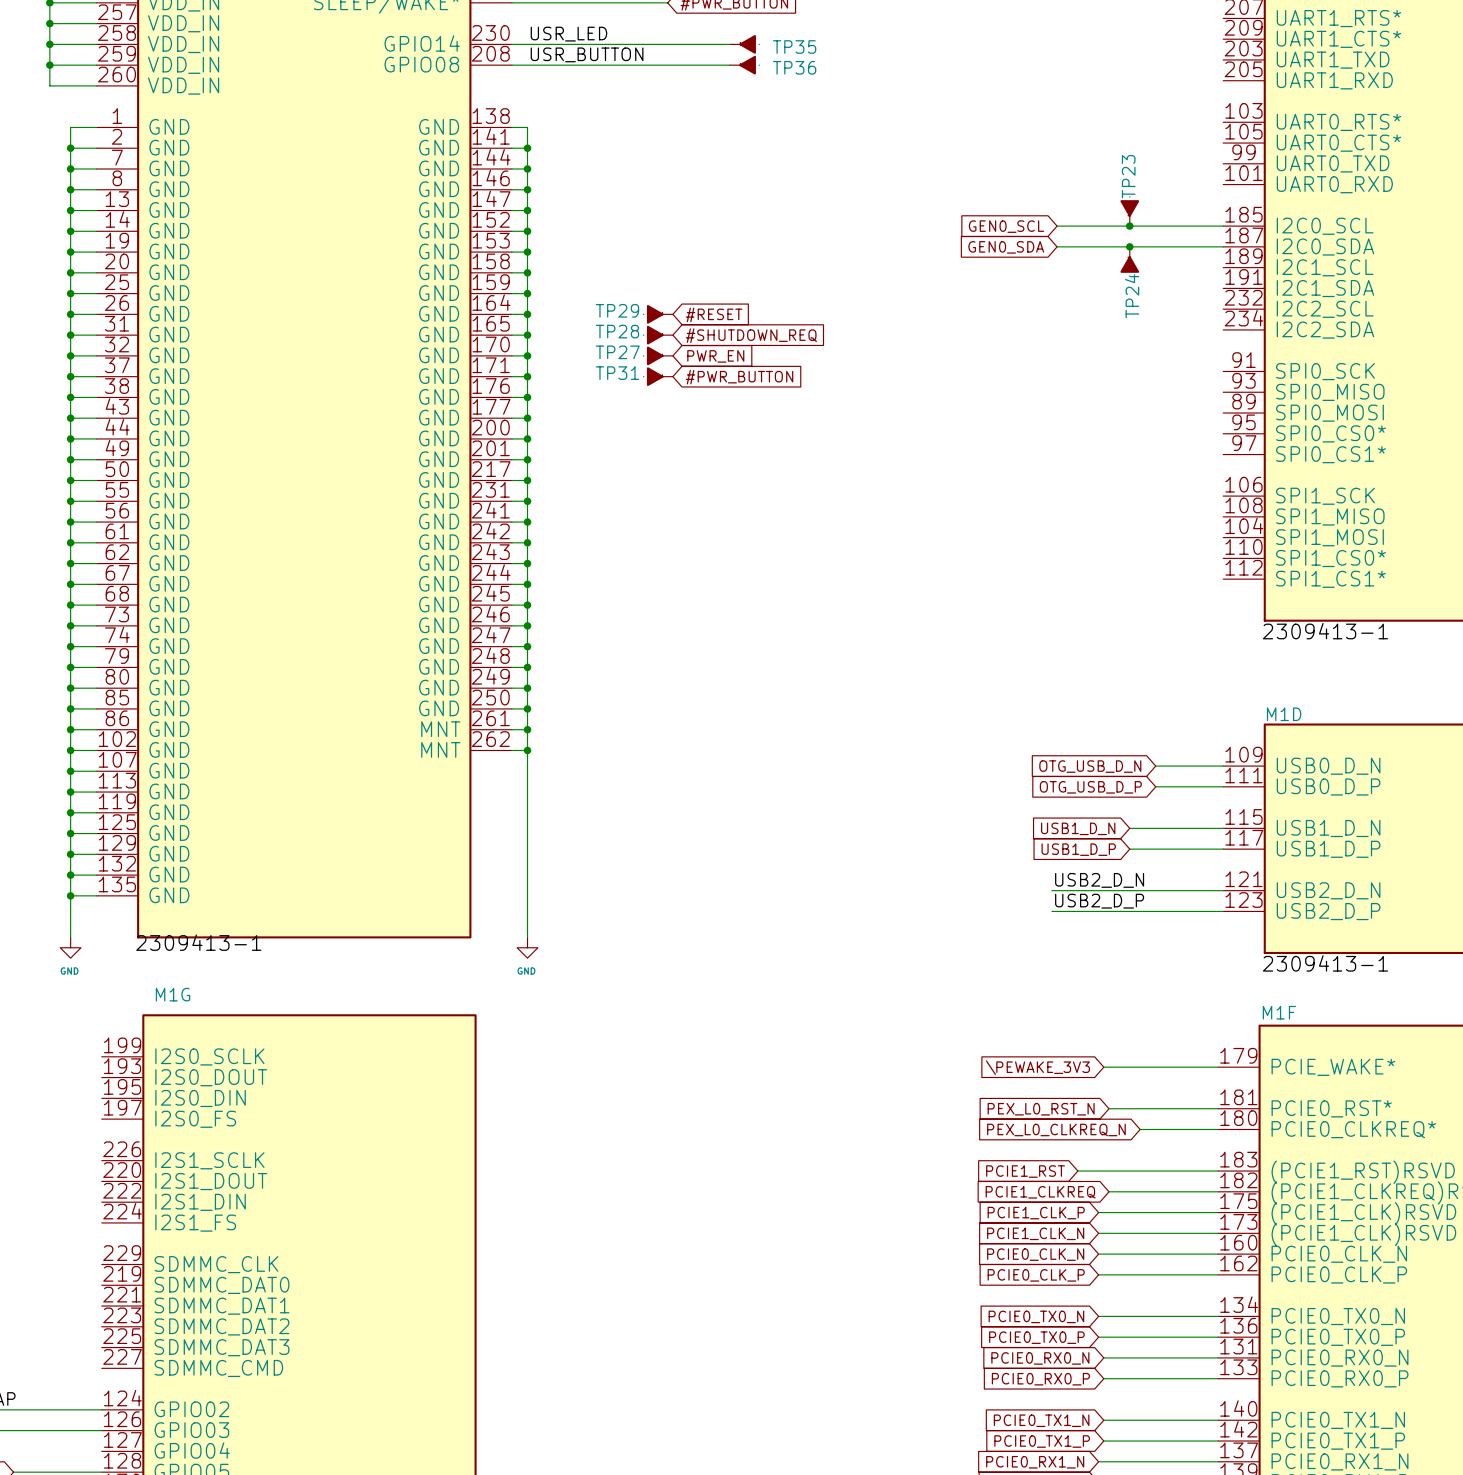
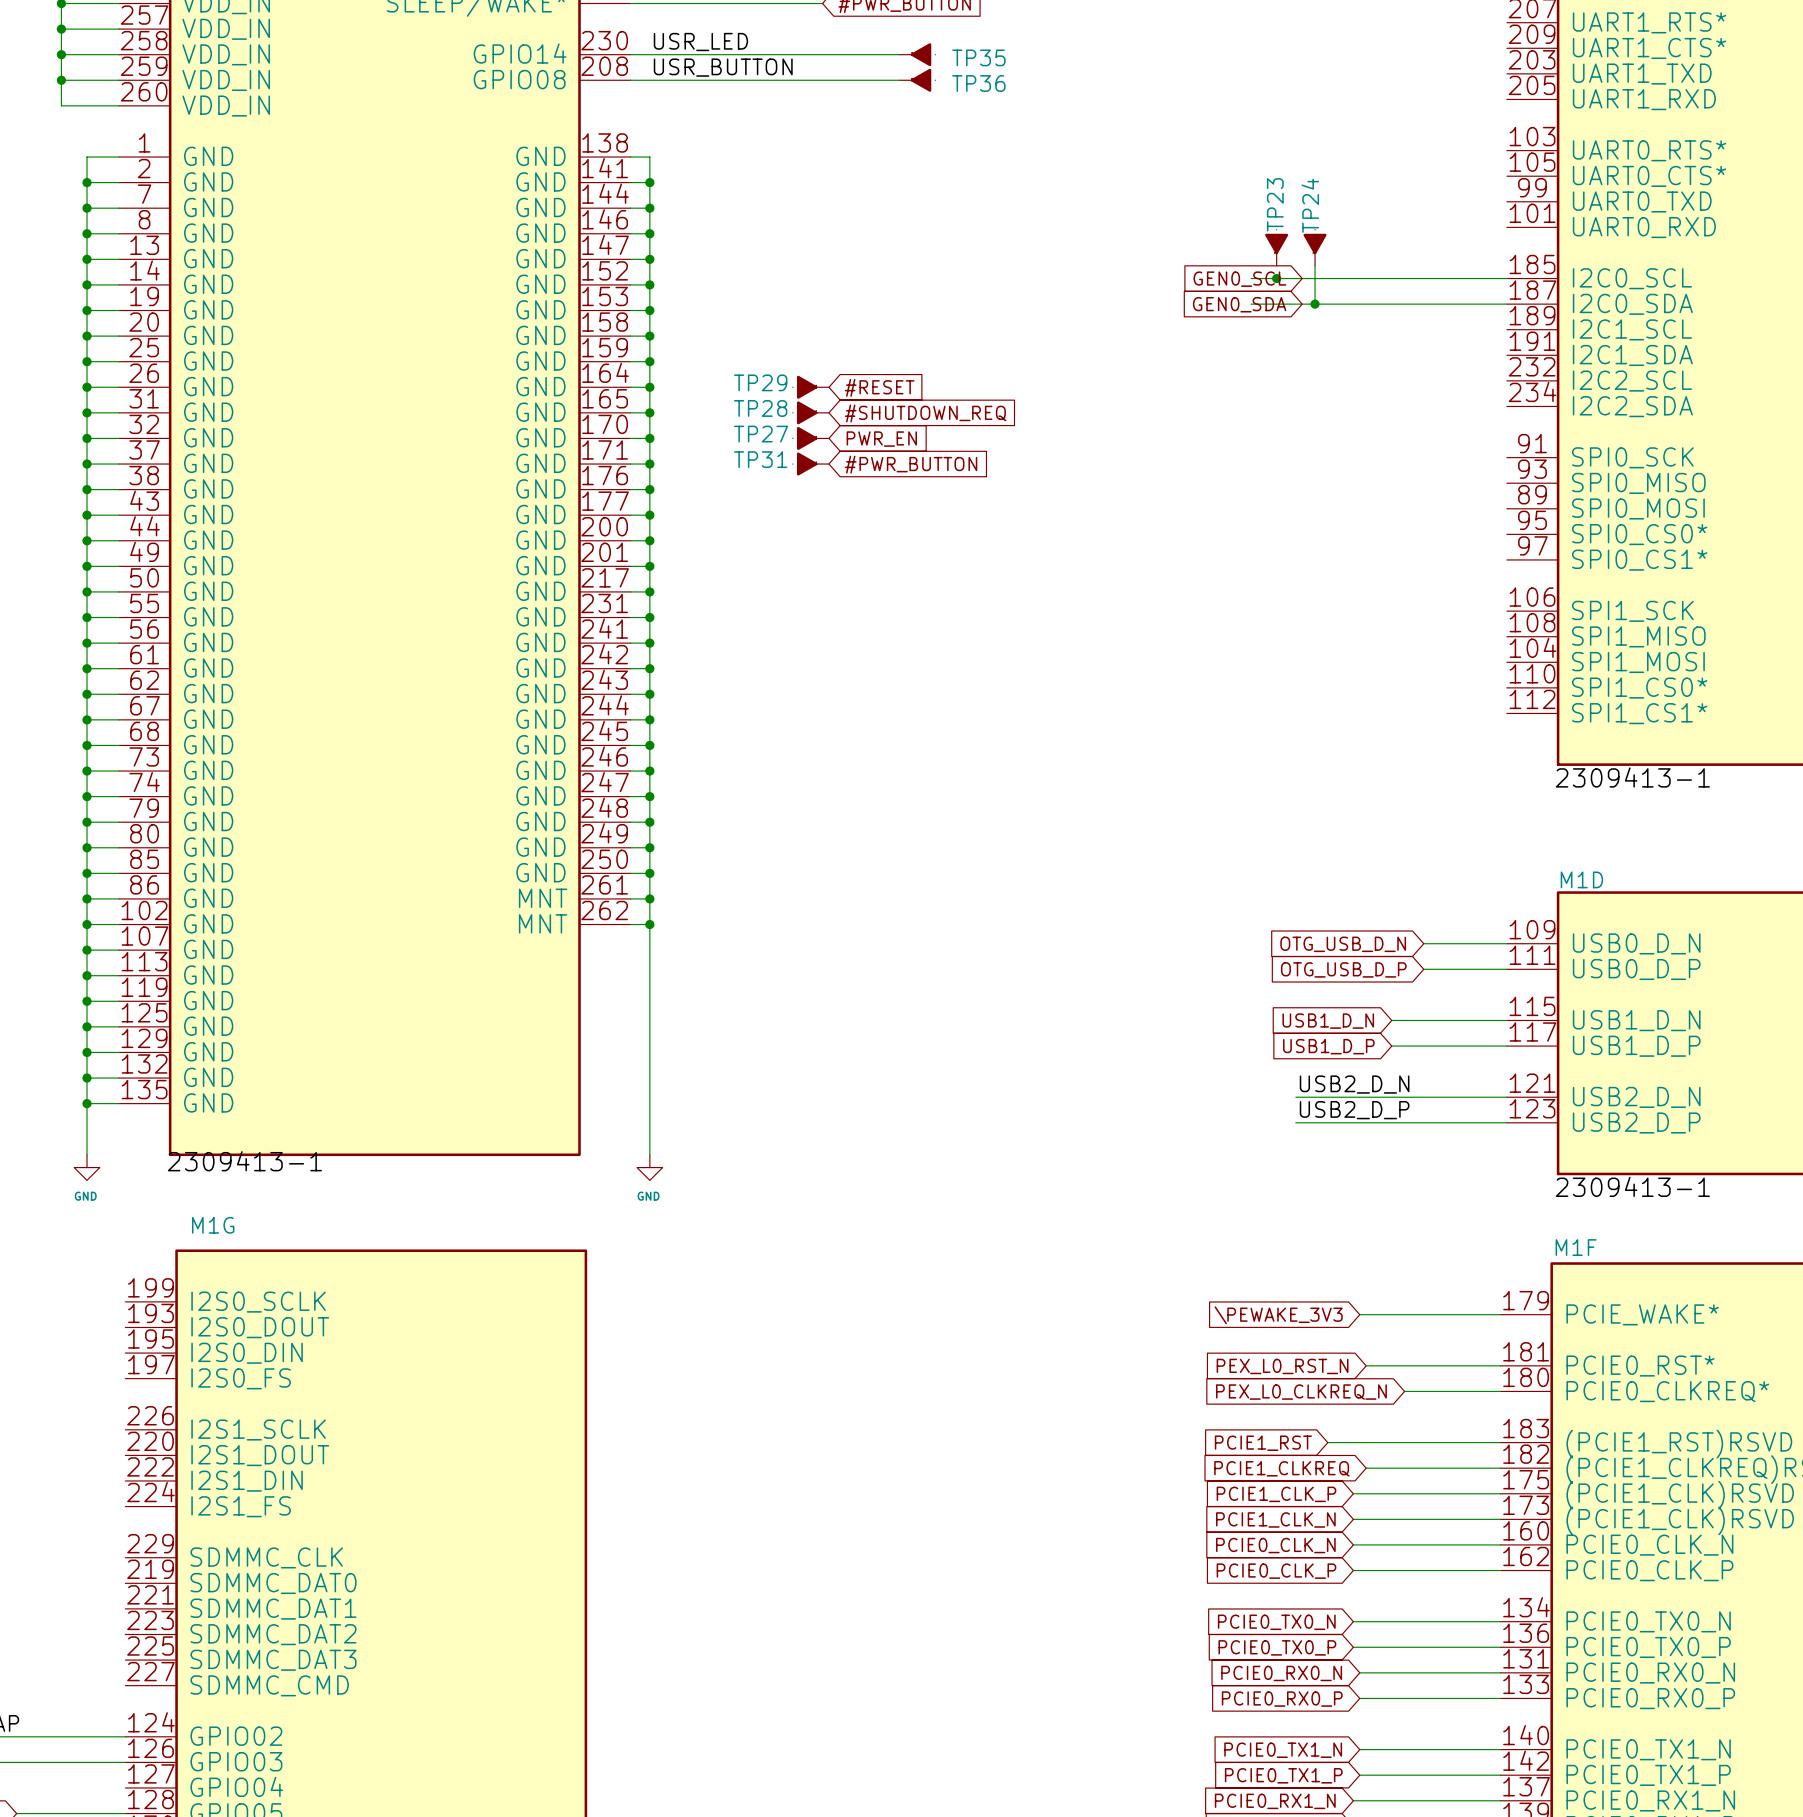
TP23 position: (1129, 213) -> (1276, 249)
wire: none -> (1315, 265) (1315, 304)
wire: none -> (1251, 278) (1302, 278)
junction: none -> (1276, 278)
junction: (1129, 226) -> none
wire: none -> (1251, 304) (1302, 304)
junction: none -> (1315, 304)
junction: (1129, 246) -> none
TP24 position: (1129, 259) -> (1315, 249)
TP24 rotation: 0° (1129, 264) -> 180° (1315, 244)

